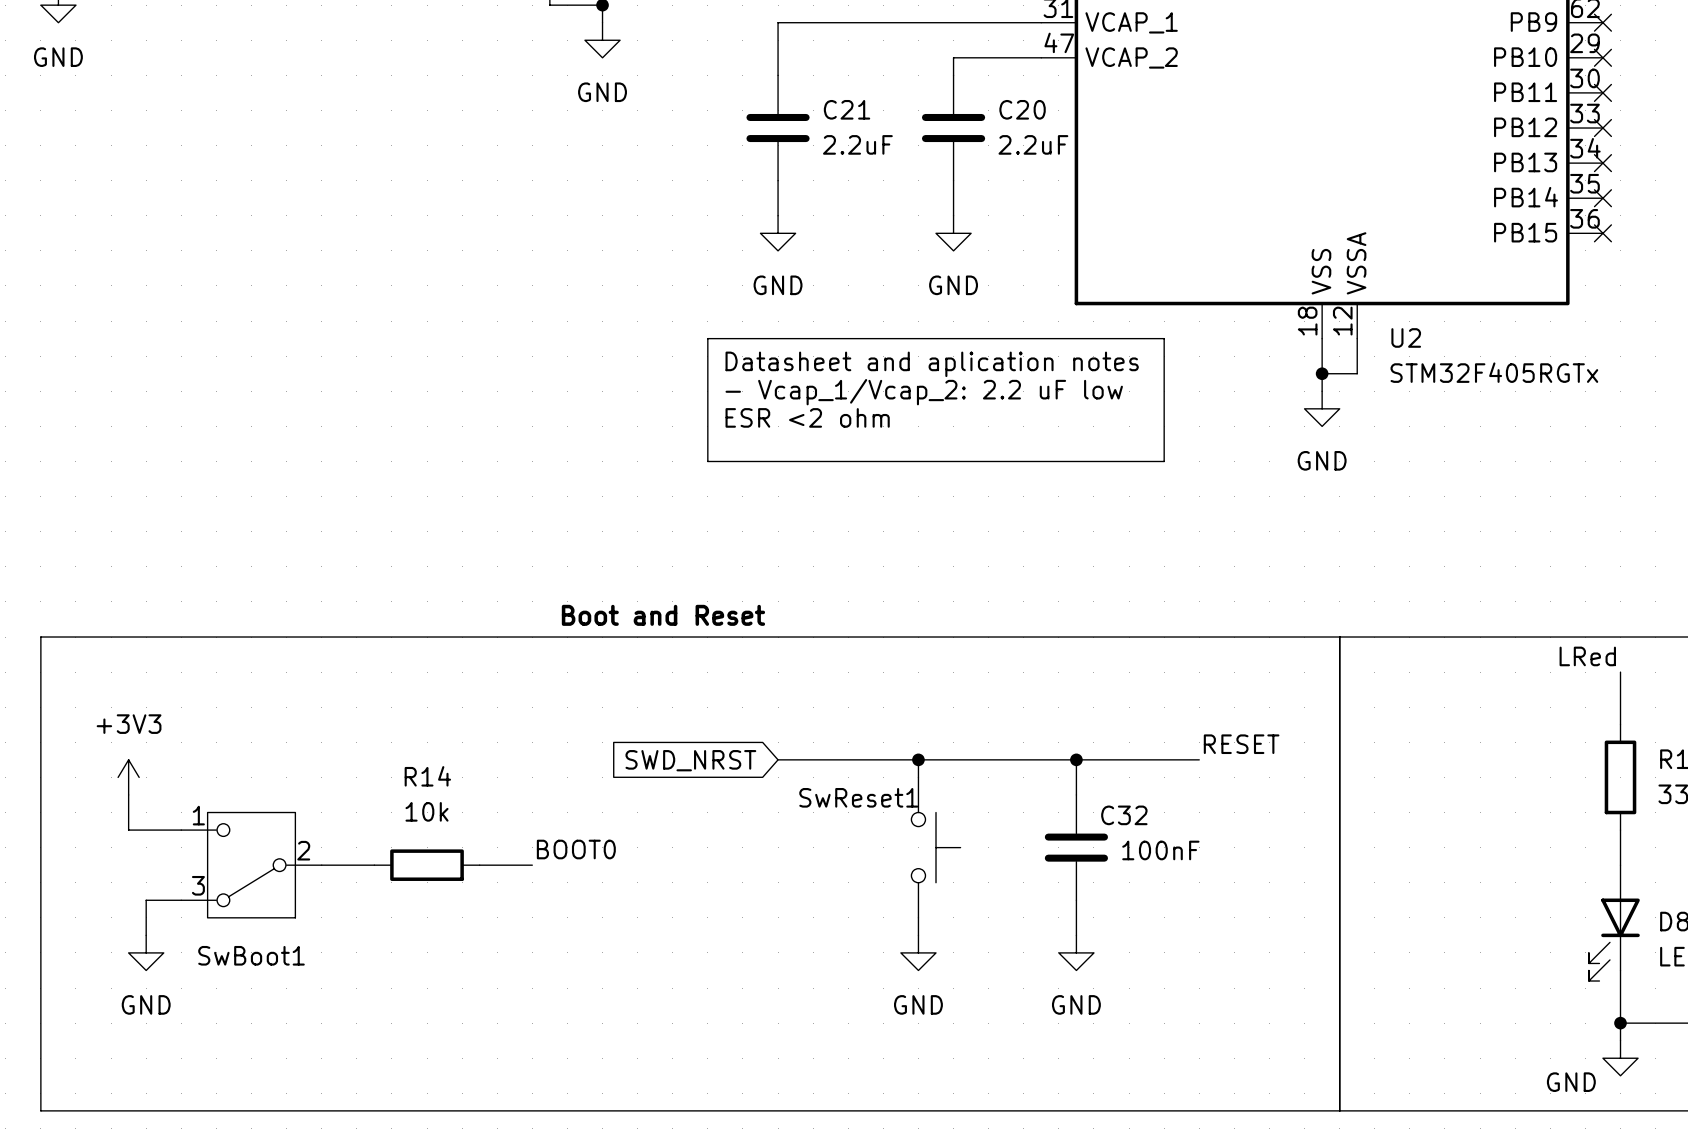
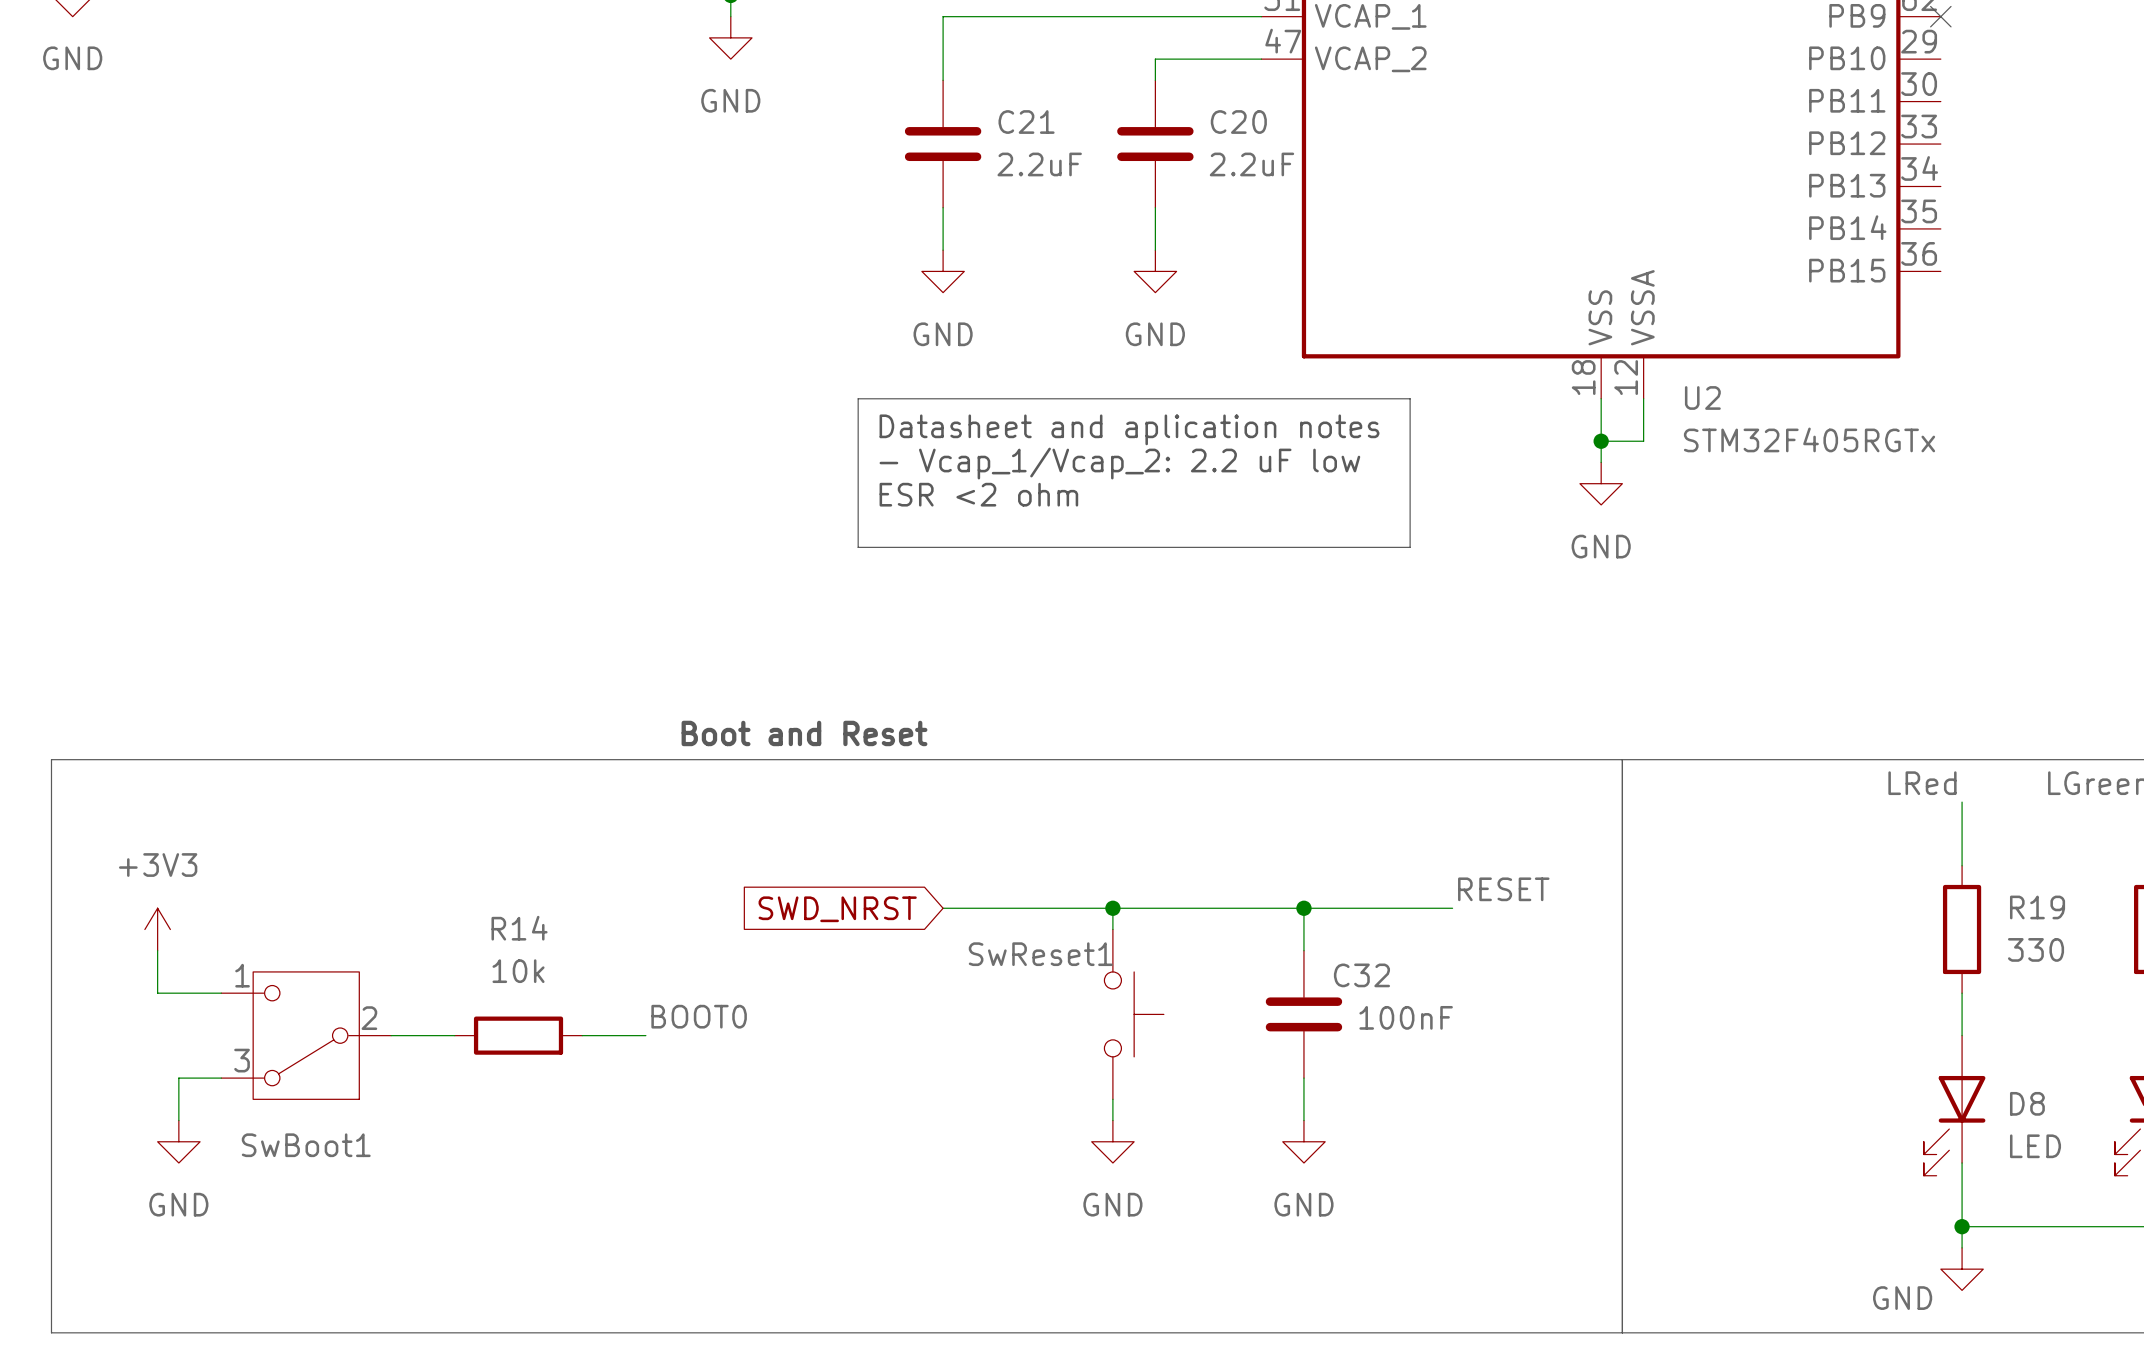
no-connect mark: (1602, 57) -> none
no-connect mark: (1602, 92) -> none
no-connect mark: (1602, 128) -> none
no-connect mark: (1602, 163) -> none
no-connect mark: (1602, 198) -> none
no-connect mark: (1602, 233) -> none

